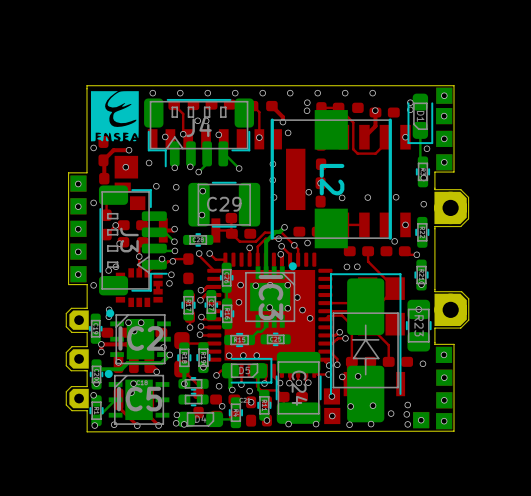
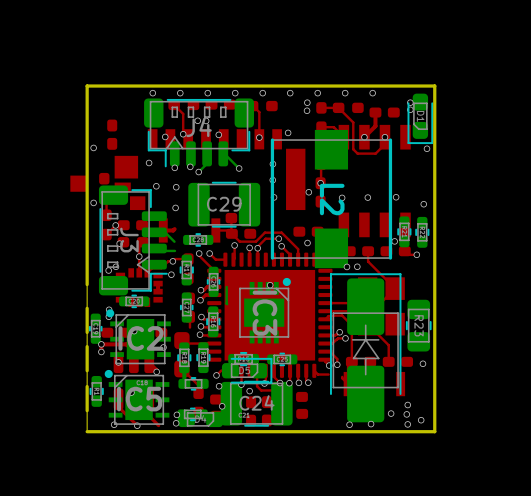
drawing: [90, 91, 139, 142] -> none
part: (444, 95) -> none
via: (444, 95) -> none
top track: (271, 106) (282, 117) (282, 122) -> none
via: (375, 110) -> none
part: (444, 116) -> none
via: (444, 116) -> none
via: (282, 122) -> none
bottom track: (420, 130) (420, 159) (422, 162) -> none
via: none -> (364, 137)
via: none -> (384, 137)
via: (405, 137) -> none
part: (444, 138) -> none
via: (444, 138) -> none
top track: (129, 150) (113, 150) (103, 160) (104, 178) -> none
via: (129, 150) -> none
part position: (103, 151) -> (112, 134)
part: (444, 162) -> none
via: (444, 162) -> none
via: (125, 167) -> none
part: (422, 171) -> none
via: (423, 178) -> none
L2 position: (331, 179) -> (331, 199)
part: (78, 183) -> none
via: (78, 184) -> none
via: (202, 191) -> none
part: (78, 206) -> none
via: (78, 206) -> none
part: (450, 207) -> none
via: (201, 215) -> none
top track: (364, 224) (343, 224) -> none
via: (405, 224) -> none
bottom track: (284, 227) (280, 231) (275, 231) (266, 241) (266, 272) -> none
via: (284, 227) -> none
part: (78, 228) -> none
via: (78, 229) -> none
via: (174, 229) -> none
via: (174, 241) -> none
top track: none -> (234, 245) (233, 259)
via: none -> (234, 245)
via: (294, 245) -> none
via: none -> (257, 248)
via: (174, 250) -> none
part: (78, 251) -> none
via: (78, 251) -> none
via: (280, 254) -> none
via: (162, 259) -> none
part: (78, 274) -> none
via: (78, 274) -> none
part position: (421, 275) -> (404, 231)
part position: (226, 277) -> (213, 281)
via: (169, 283) -> none
board edge: (87, 284) (68, 284) (68, 172) (86, 172) (86, 85) (454, 85) (454, 172) (434, 172) (434, 189) (460, 189) (468, 197) (468, 218) (460, 226) (434, 226) (434, 291) (461, 291) (468, 298) (468, 320) (460, 328) (434, 328) (434, 344) (454, 344) (454, 431) (87, 431) -> (87, 284) (87, 86) (434, 86) (434, 431) (87, 431)
via: (421, 284) -> none
via: (93, 285) -> none
via: (240, 285) -> none
via: (255, 285) -> none
via: (287, 285) -> none
IC3 position: (270, 294) -> (265, 310)
via: (297, 297) -> none
via: (238, 302) -> none
part position: (188, 305) -> (186, 270)
part position: (211, 305) -> (186, 307)
via: (269, 307) -> none
board edge: (87, 308) (71, 308) (66, 313) (66, 326) (71, 332) (87, 332) -> (87, 308) (87, 332)
via: (287, 308) -> none
via: (418, 309) -> none
part: (450, 309) -> none
via: (302, 310) -> none
part position: (227, 313) -> (213, 321)
via: (310, 318) -> none
part: (79, 320) -> none
bottom track: (266, 321) (266, 326) (249, 340) -> none
via: (128, 322) -> none
via: (141, 322) -> none
via: (189, 327) -> none
part position: (275, 339) -> (282, 359)
part position: (239, 340) -> (243, 359)
board edge: (87, 346) (72, 346) (66, 352) (66, 365) (71, 370) (87, 370) -> (87, 346) (87, 370)
bottom track: (169, 354) (161, 363) (127, 363) (121, 369) (100, 369) (96, 365) -> none
via: (169, 354) -> none
part: (443, 354) -> none
via: (443, 354) -> none
via: (229, 355) -> none
via: (243, 355) -> none
via: (256, 355) -> none
part: (79, 358) -> none
via: (203, 367) -> none
bottom track: (230, 370) (230, 388) (232, 389) -> none
bottom track: (258, 370) (258, 389) (264, 395) -> none
part rotation: 0° (96, 374) -> 90° clockwise (134, 301)
part position: (96, 374) -> (134, 301)
via: (328, 374) -> none
via: (342, 376) -> none
via: (358, 376) -> none
part: (444, 377) -> none
via: (444, 377) -> none
via: (96, 383) -> none
via: (133, 383) -> none
via: (184, 383) -> none
board edge: (87, 386) (71, 386) (66, 391) (66, 405) (71, 410) (87, 410) -> (87, 386) (87, 410)
C24 rotation: 0° (298, 387) -> 90° clockwise (256, 403)
C24 position: (298, 387) -> (256, 403)
via: (232, 389) -> none
via: (93, 395) -> none
part: (331, 396) -> none
via: (331, 396) -> none
part: (79, 398) -> none
bottom track: (115, 399) (94, 420) (94, 425) -> none
part position: (193, 399) -> (192, 414)
part: (444, 400) -> none
via: (444, 400) -> none
via: (251, 402) -> none
part: (264, 405) -> none
via: (373, 405) -> none
via: (350, 406) -> none
part position: (96, 410) -> (96, 391)
part: (235, 412) -> none
part: (332, 416) -> none
via: (332, 416) -> none
via: (266, 420) -> none
part: (421, 420) -> none
part: (444, 421) -> none
via: (444, 421) -> none
via: (184, 424) -> none
via: (288, 424) -> none
via: (316, 424) -> none
via: (94, 425) -> none
via: (158, 425) -> none

